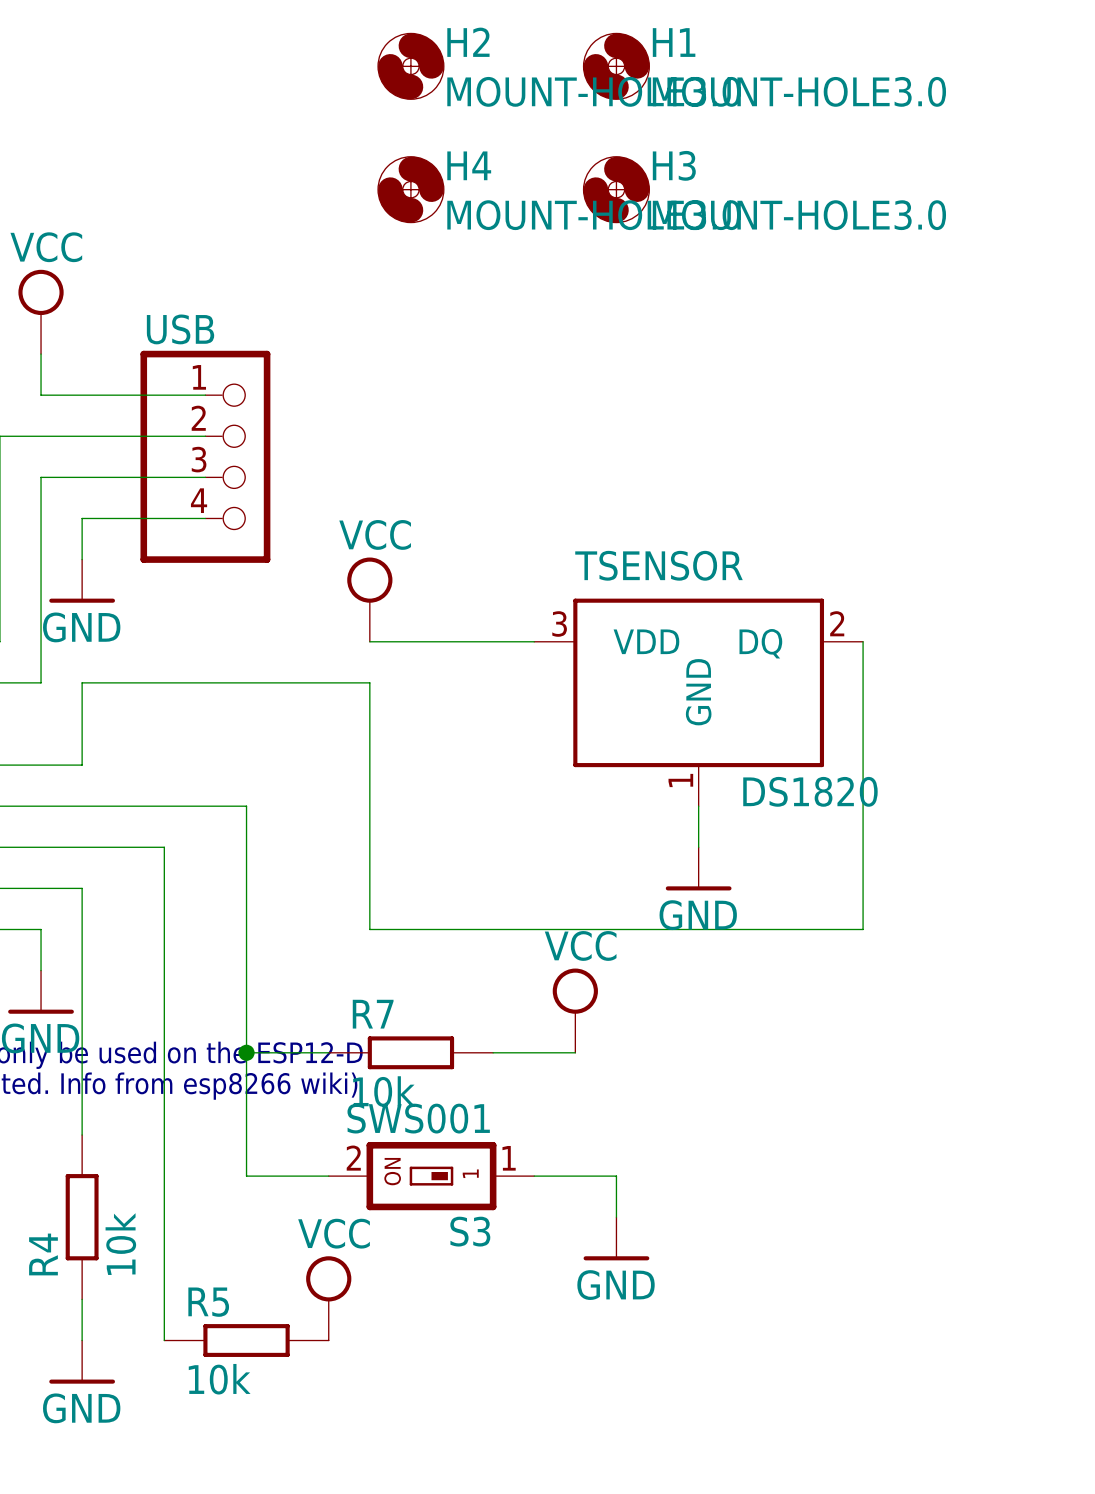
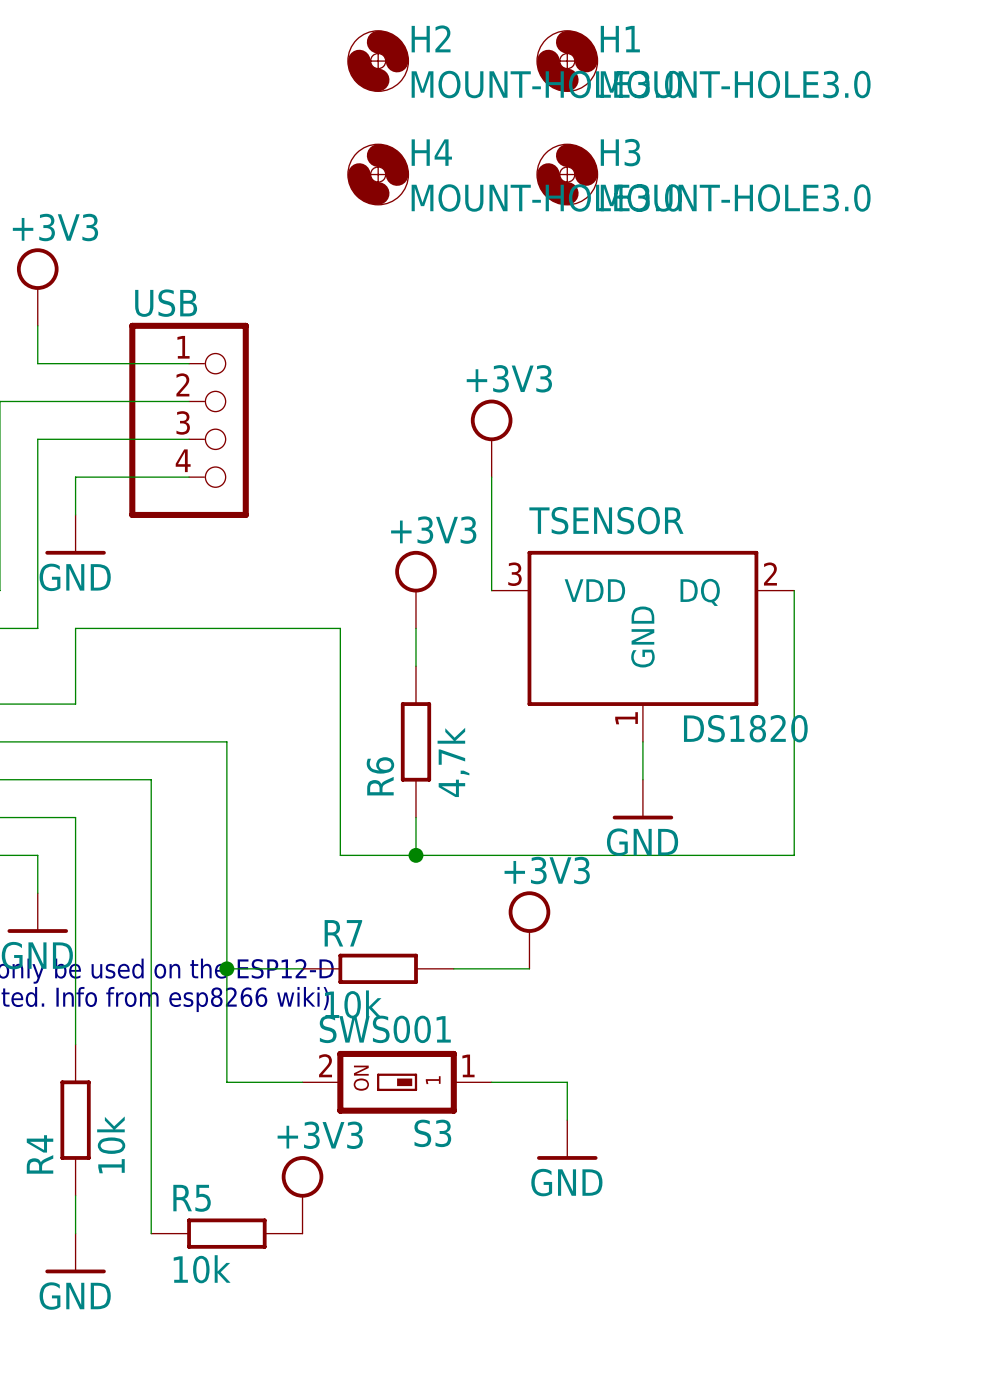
power symbol: VCC (41, 311) -> +3V3 (37, 287)
power symbol: none -> +3V3 (491, 438)
power symbol: VCC (369, 599) -> none
power symbol: none -> +3V3 (415, 589)
wire: (369, 641) (534, 641) -> (491, 477) (491, 590)
wire: none -> (415, 628) (415, 666)
R6: none -> 4,7k (415, 741)
wire: none -> (415, 817) (415, 855)
junction: none -> (415, 855)
power symbol: VCC (575, 1010) -> +3V3 (529, 930)
power symbol: VCC (328, 1298) -> +3V3 (302, 1194)

